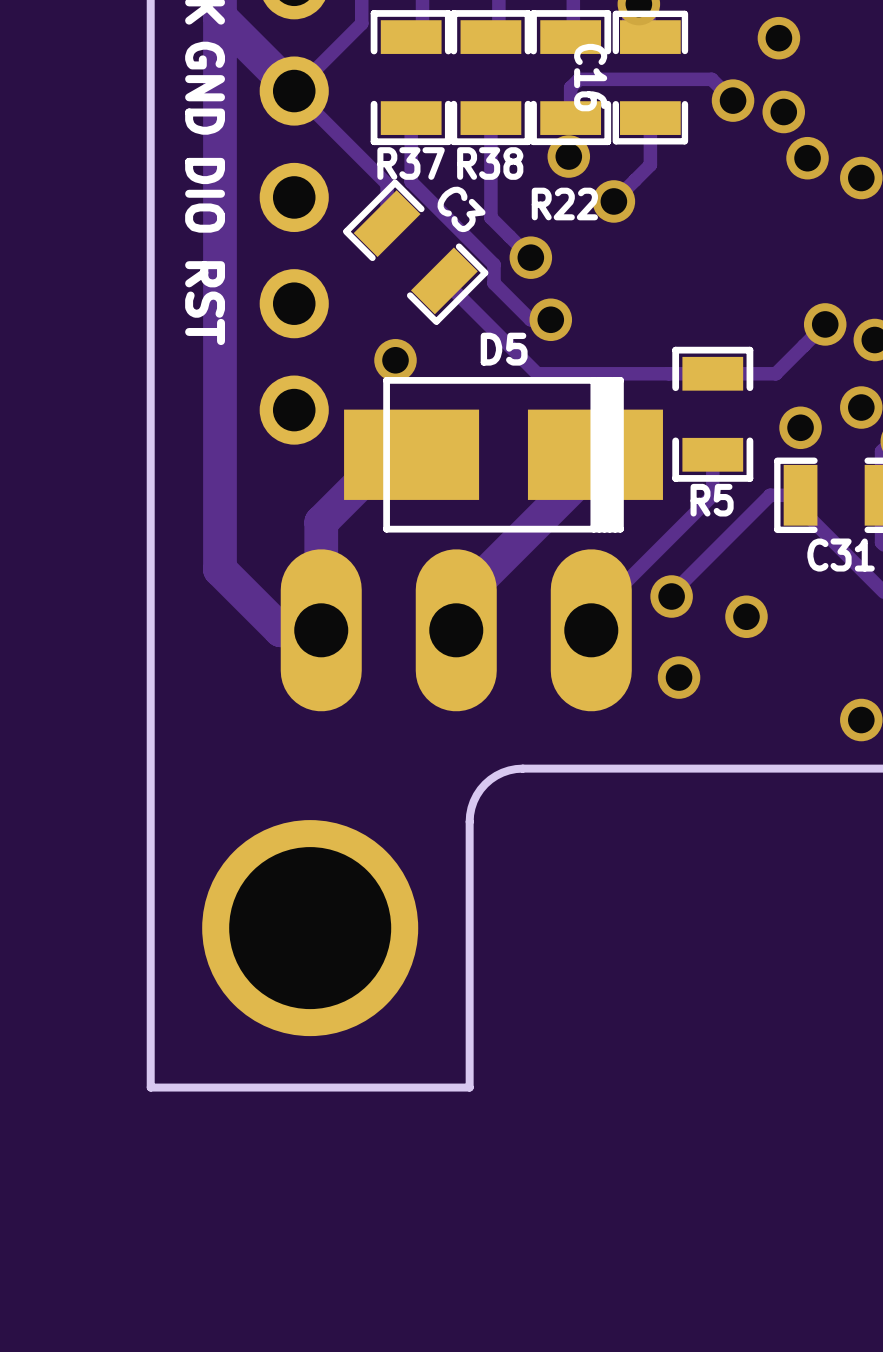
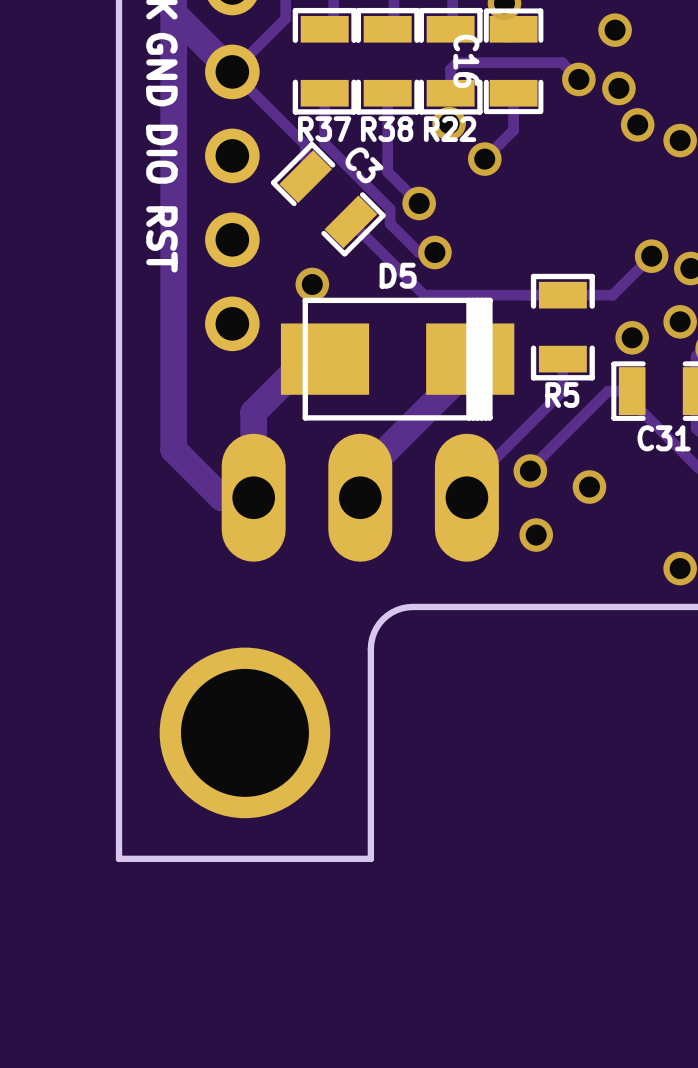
R22 name position: R22 (564, 204) -> R22 (450, 129)
D5 footprint: [344, 377, 663, 533] -> [280, 297, 515, 421]

